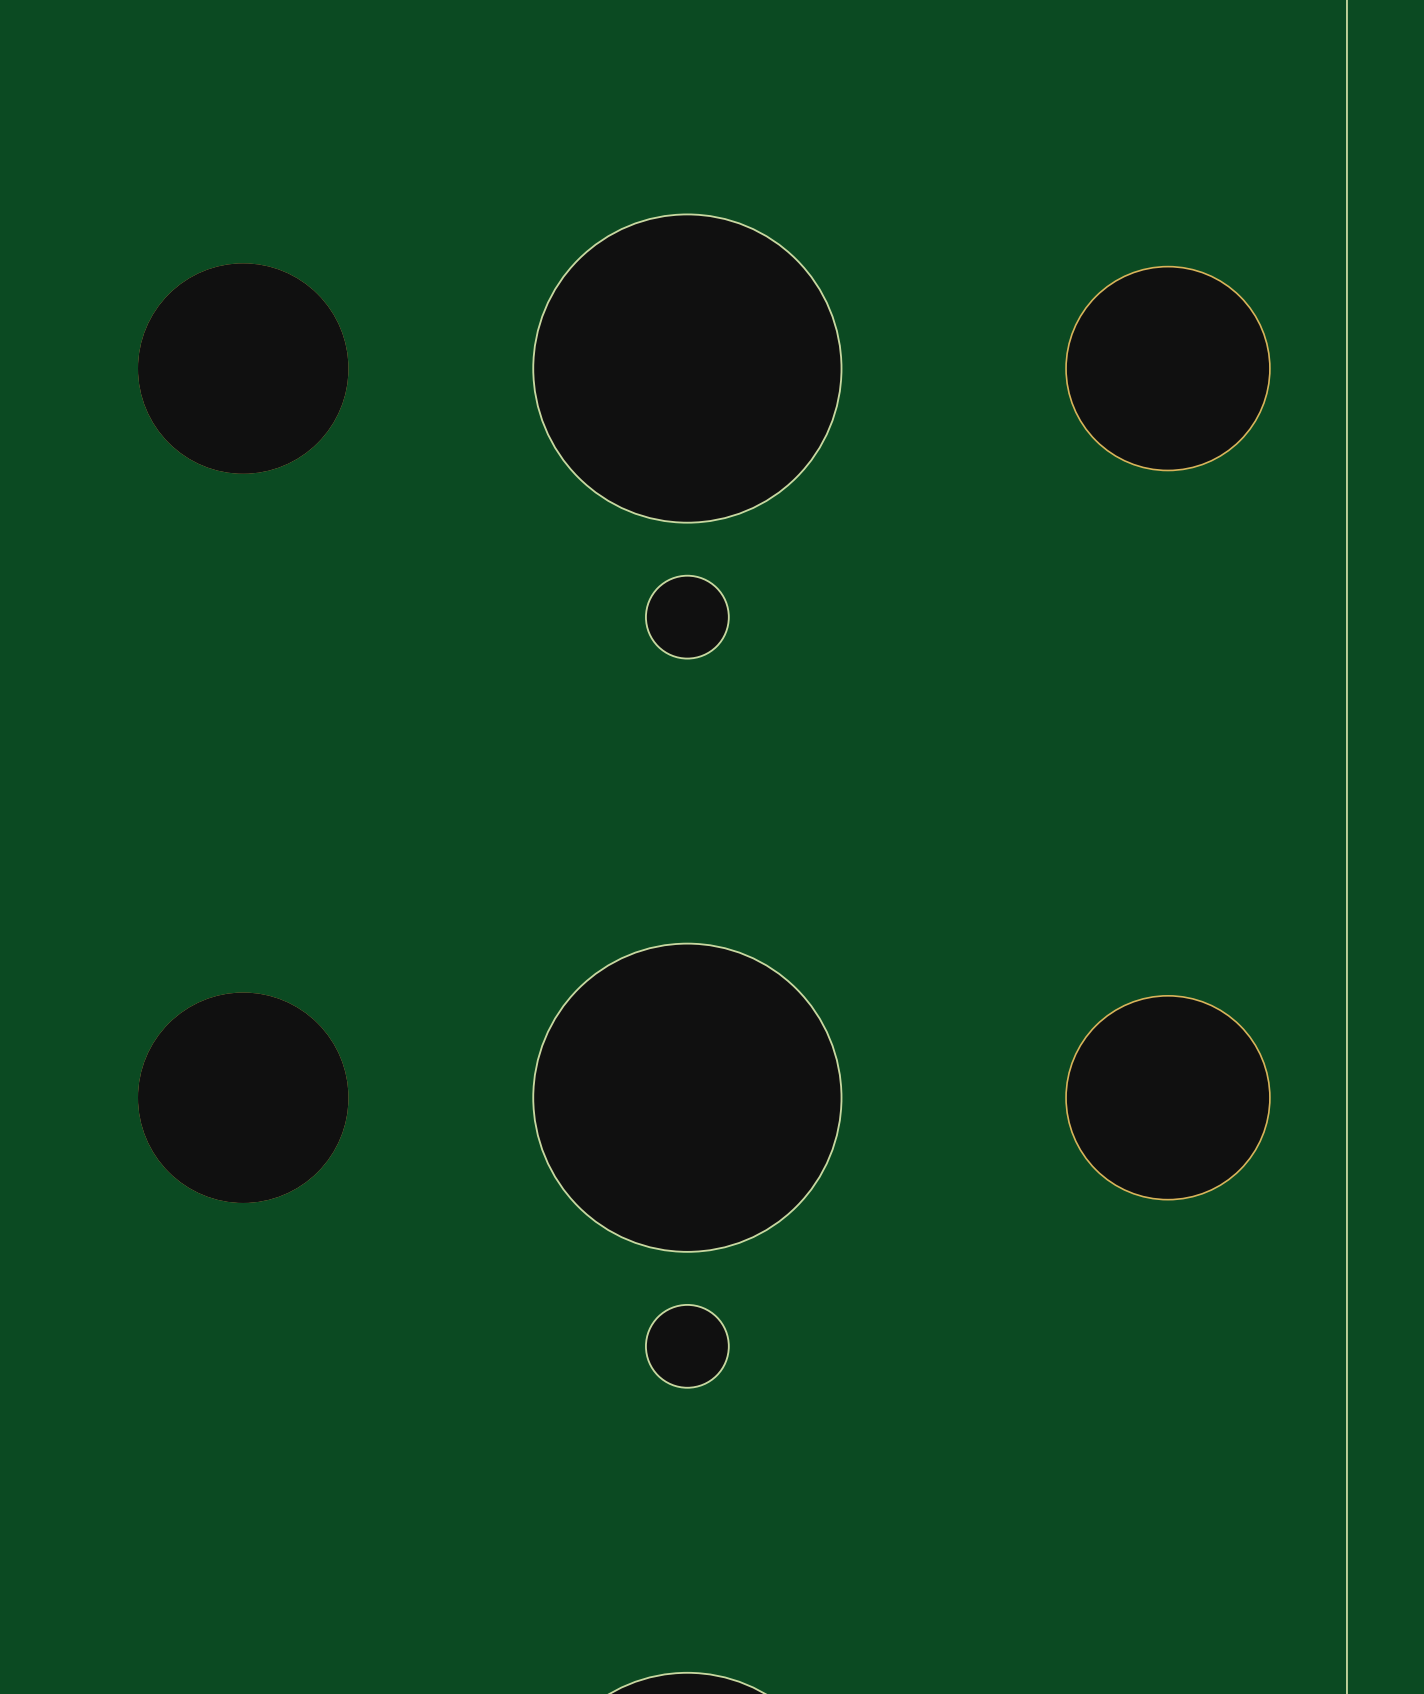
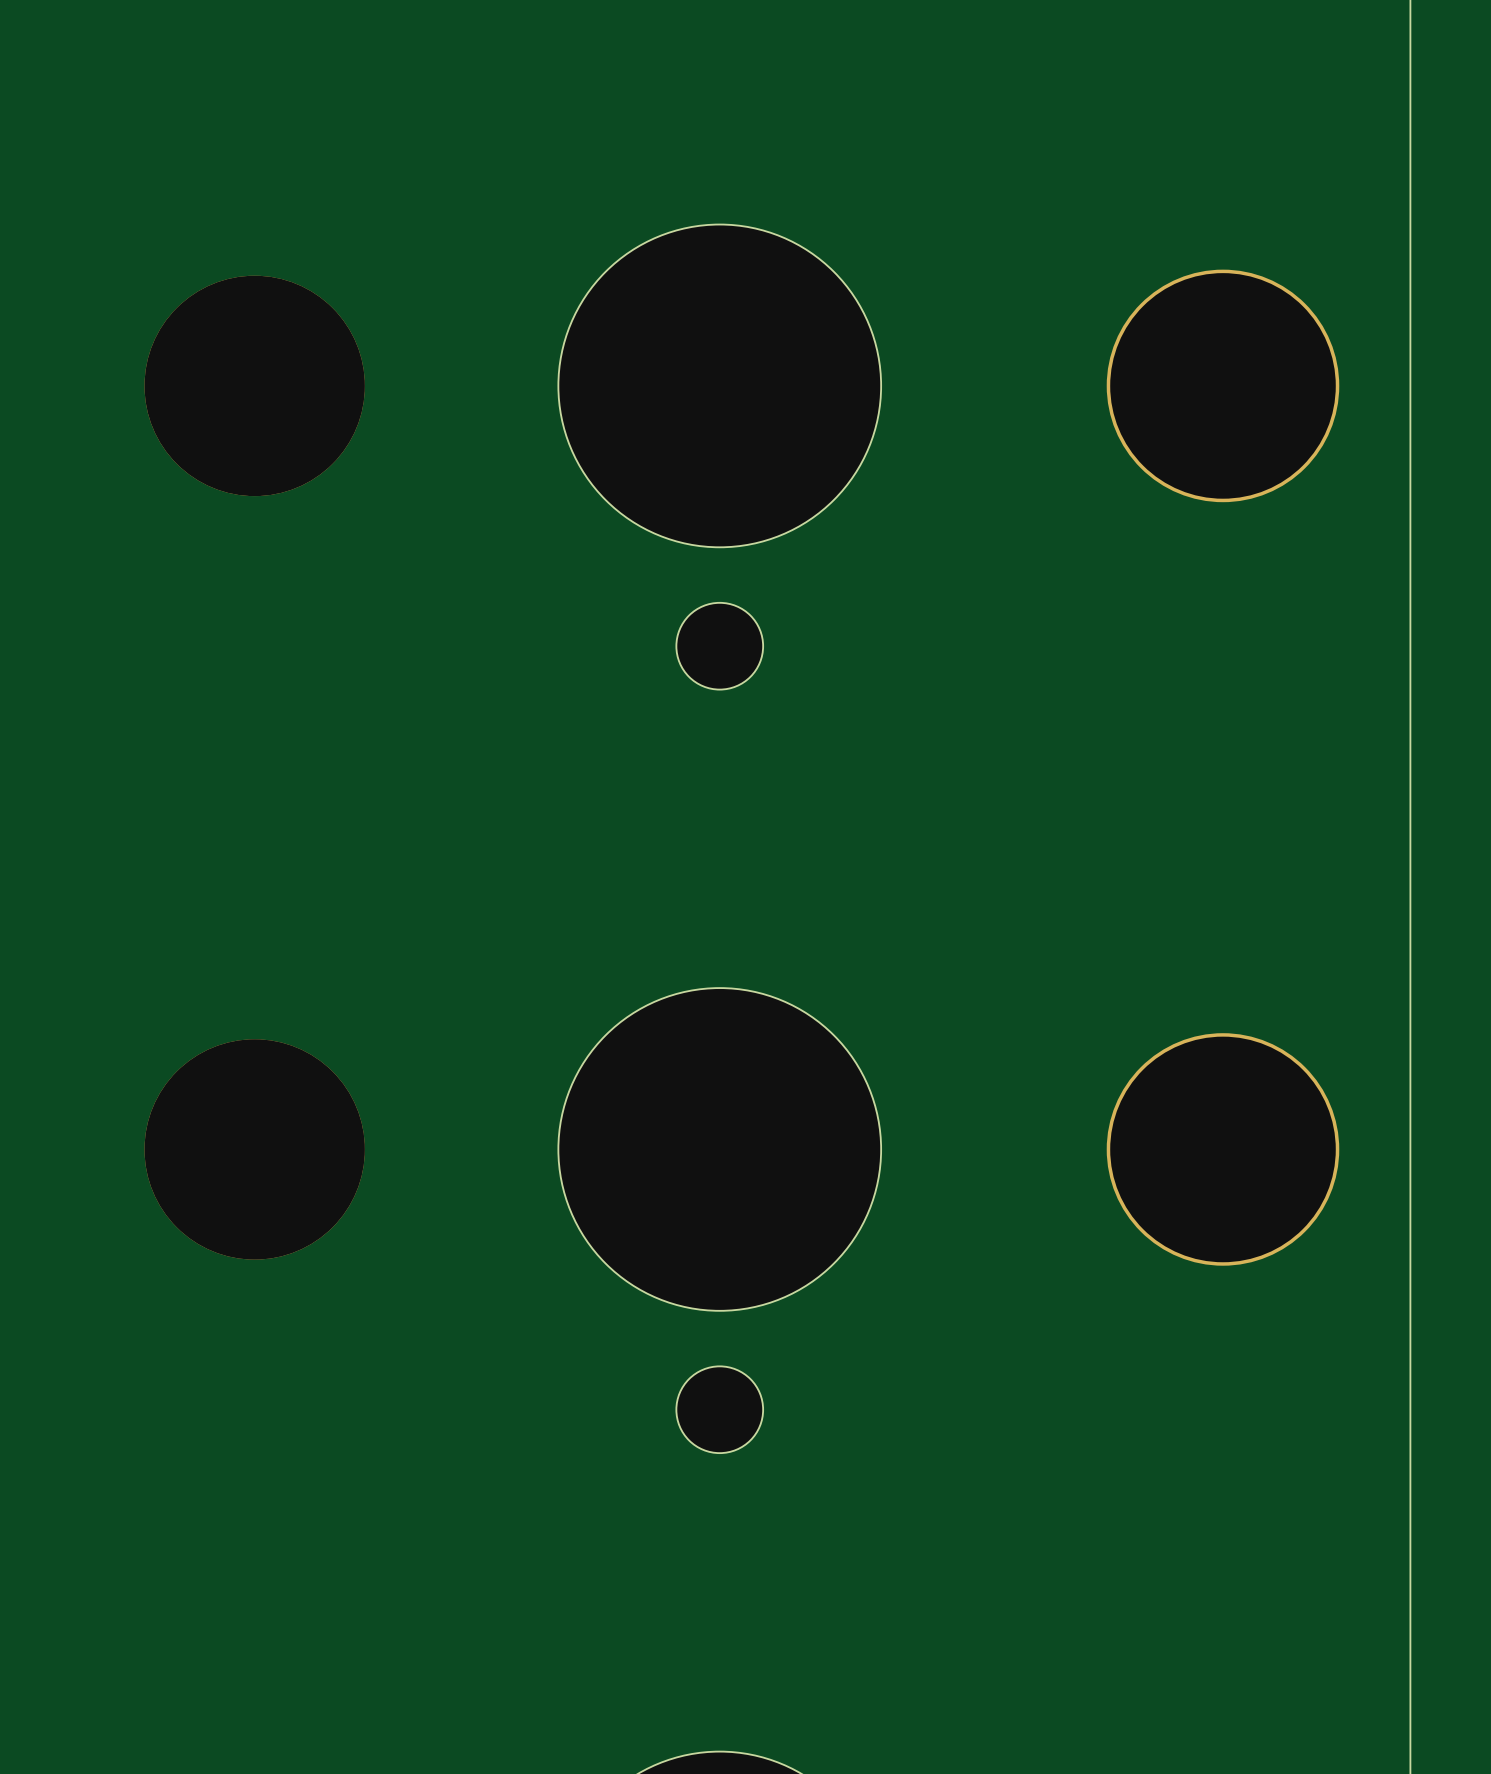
part footprint: [1065, 265, 1271, 472] -> [1106, 269, 1340, 503]
part footprint: [1065, 994, 1271, 1201] -> [1106, 1033, 1340, 1266]

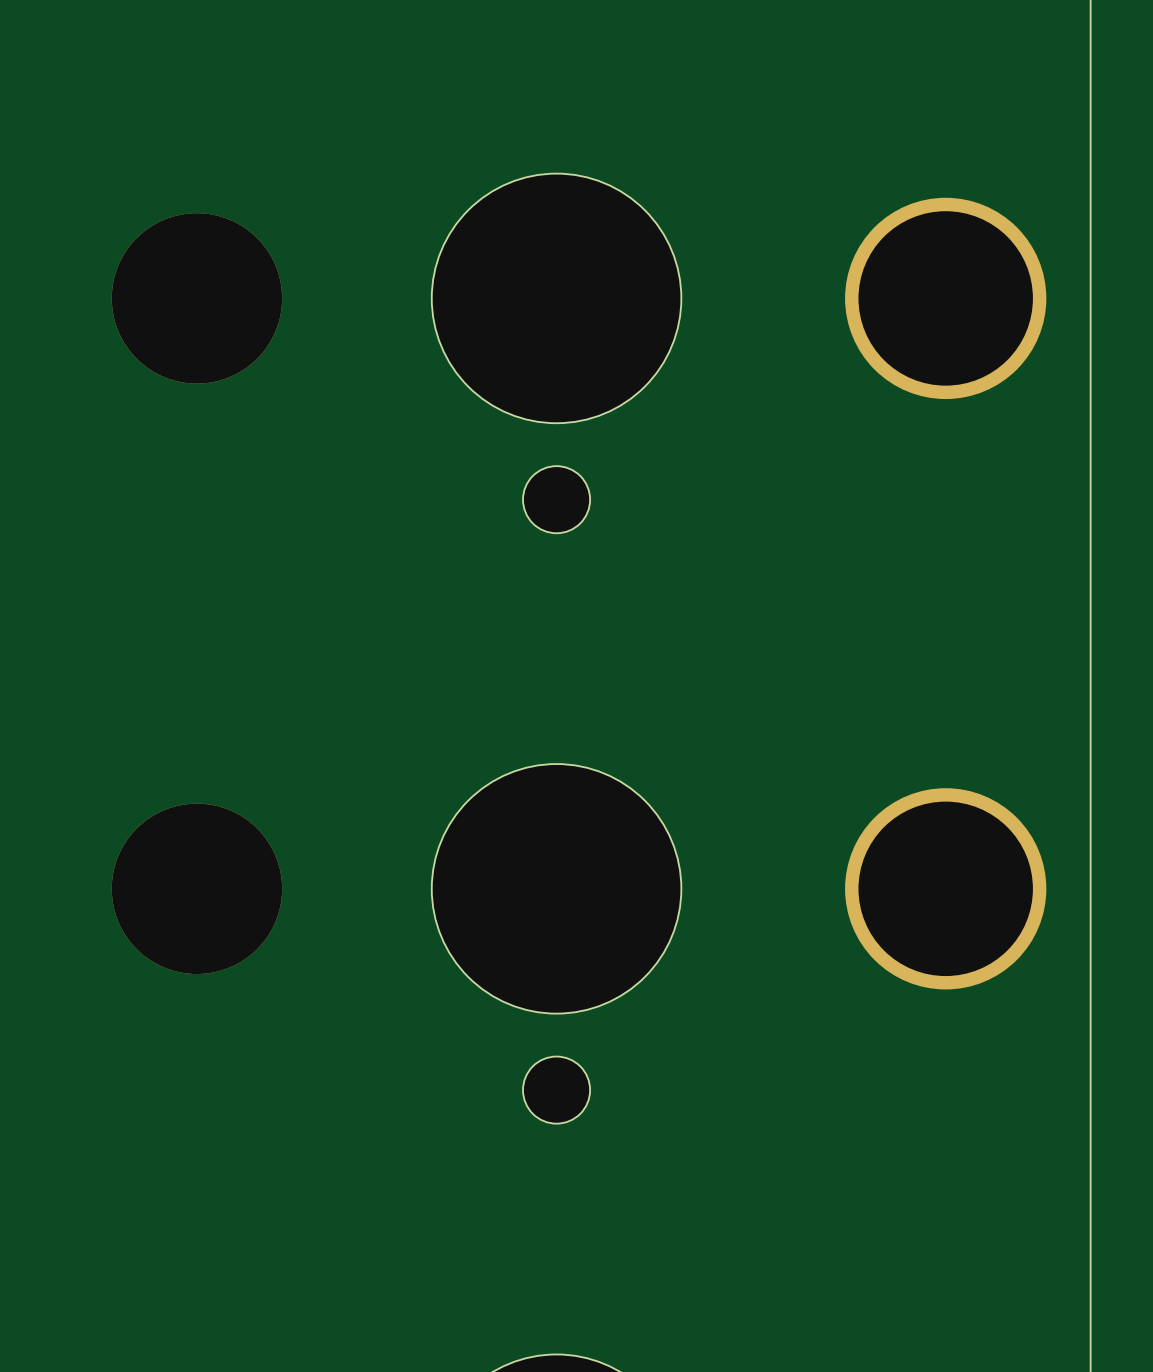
part footprint: [1106, 269, 1340, 503] -> [845, 197, 1047, 400]
part footprint: [1106, 1033, 1340, 1266] -> [845, 788, 1047, 990]

